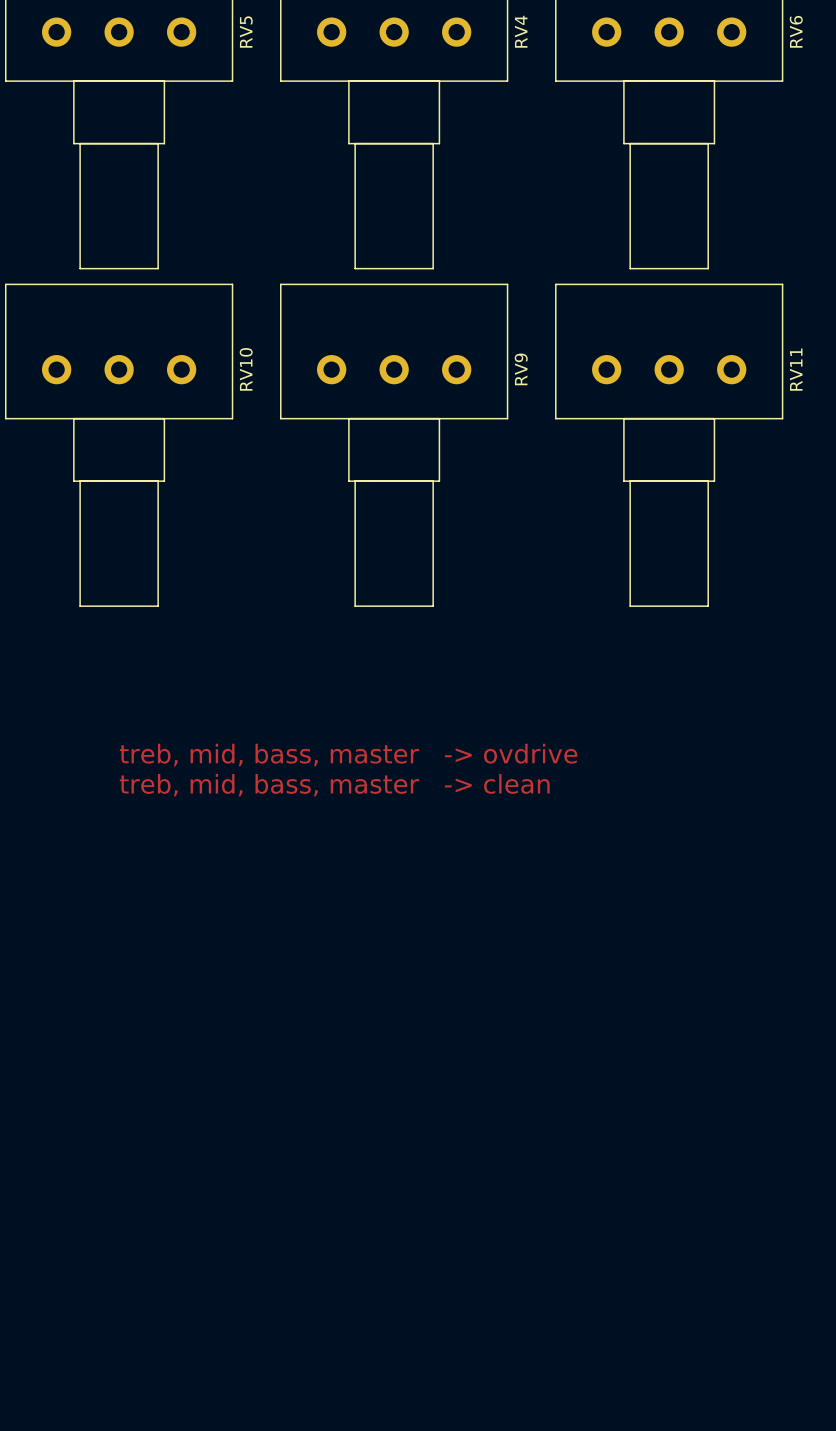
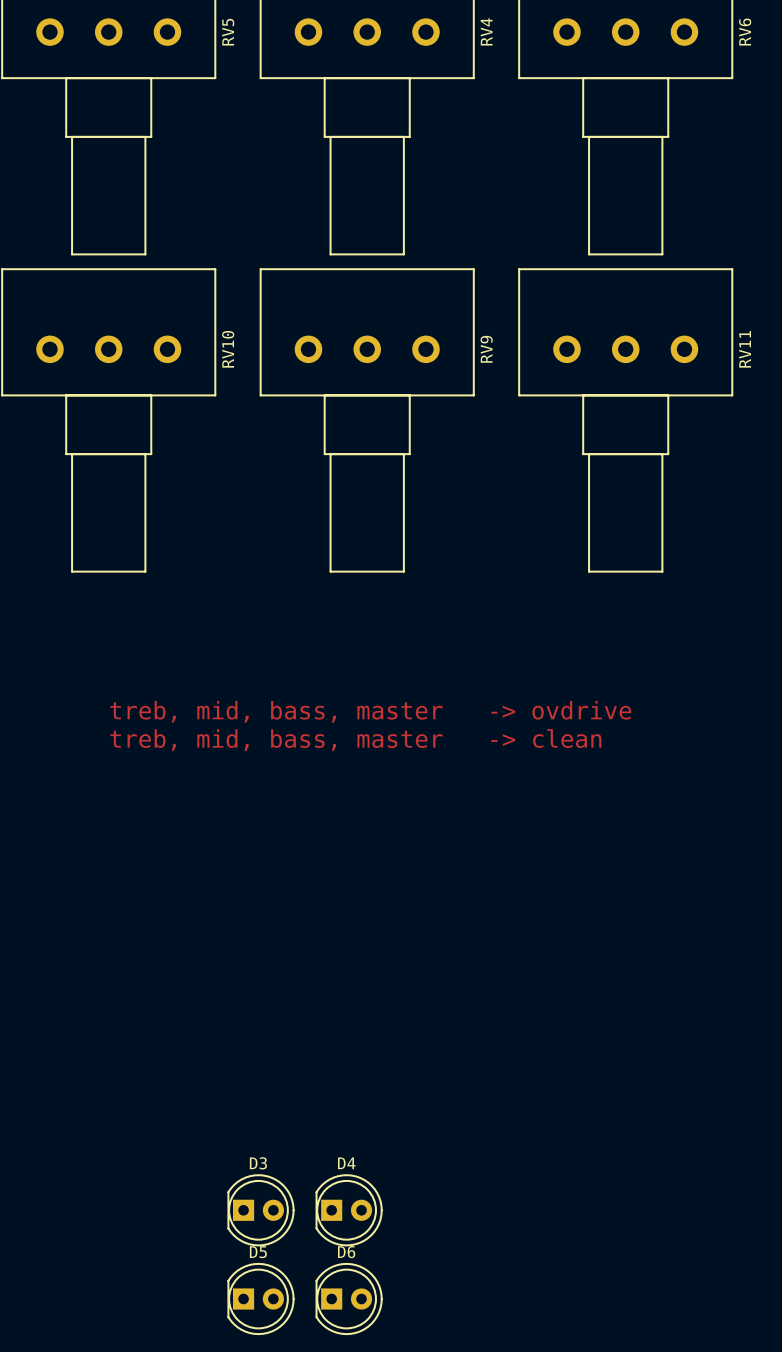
D3: none -> (261, 1210)
D4: none -> (349, 1210)
D5: none -> (261, 1299)
D6: none -> (349, 1299)

